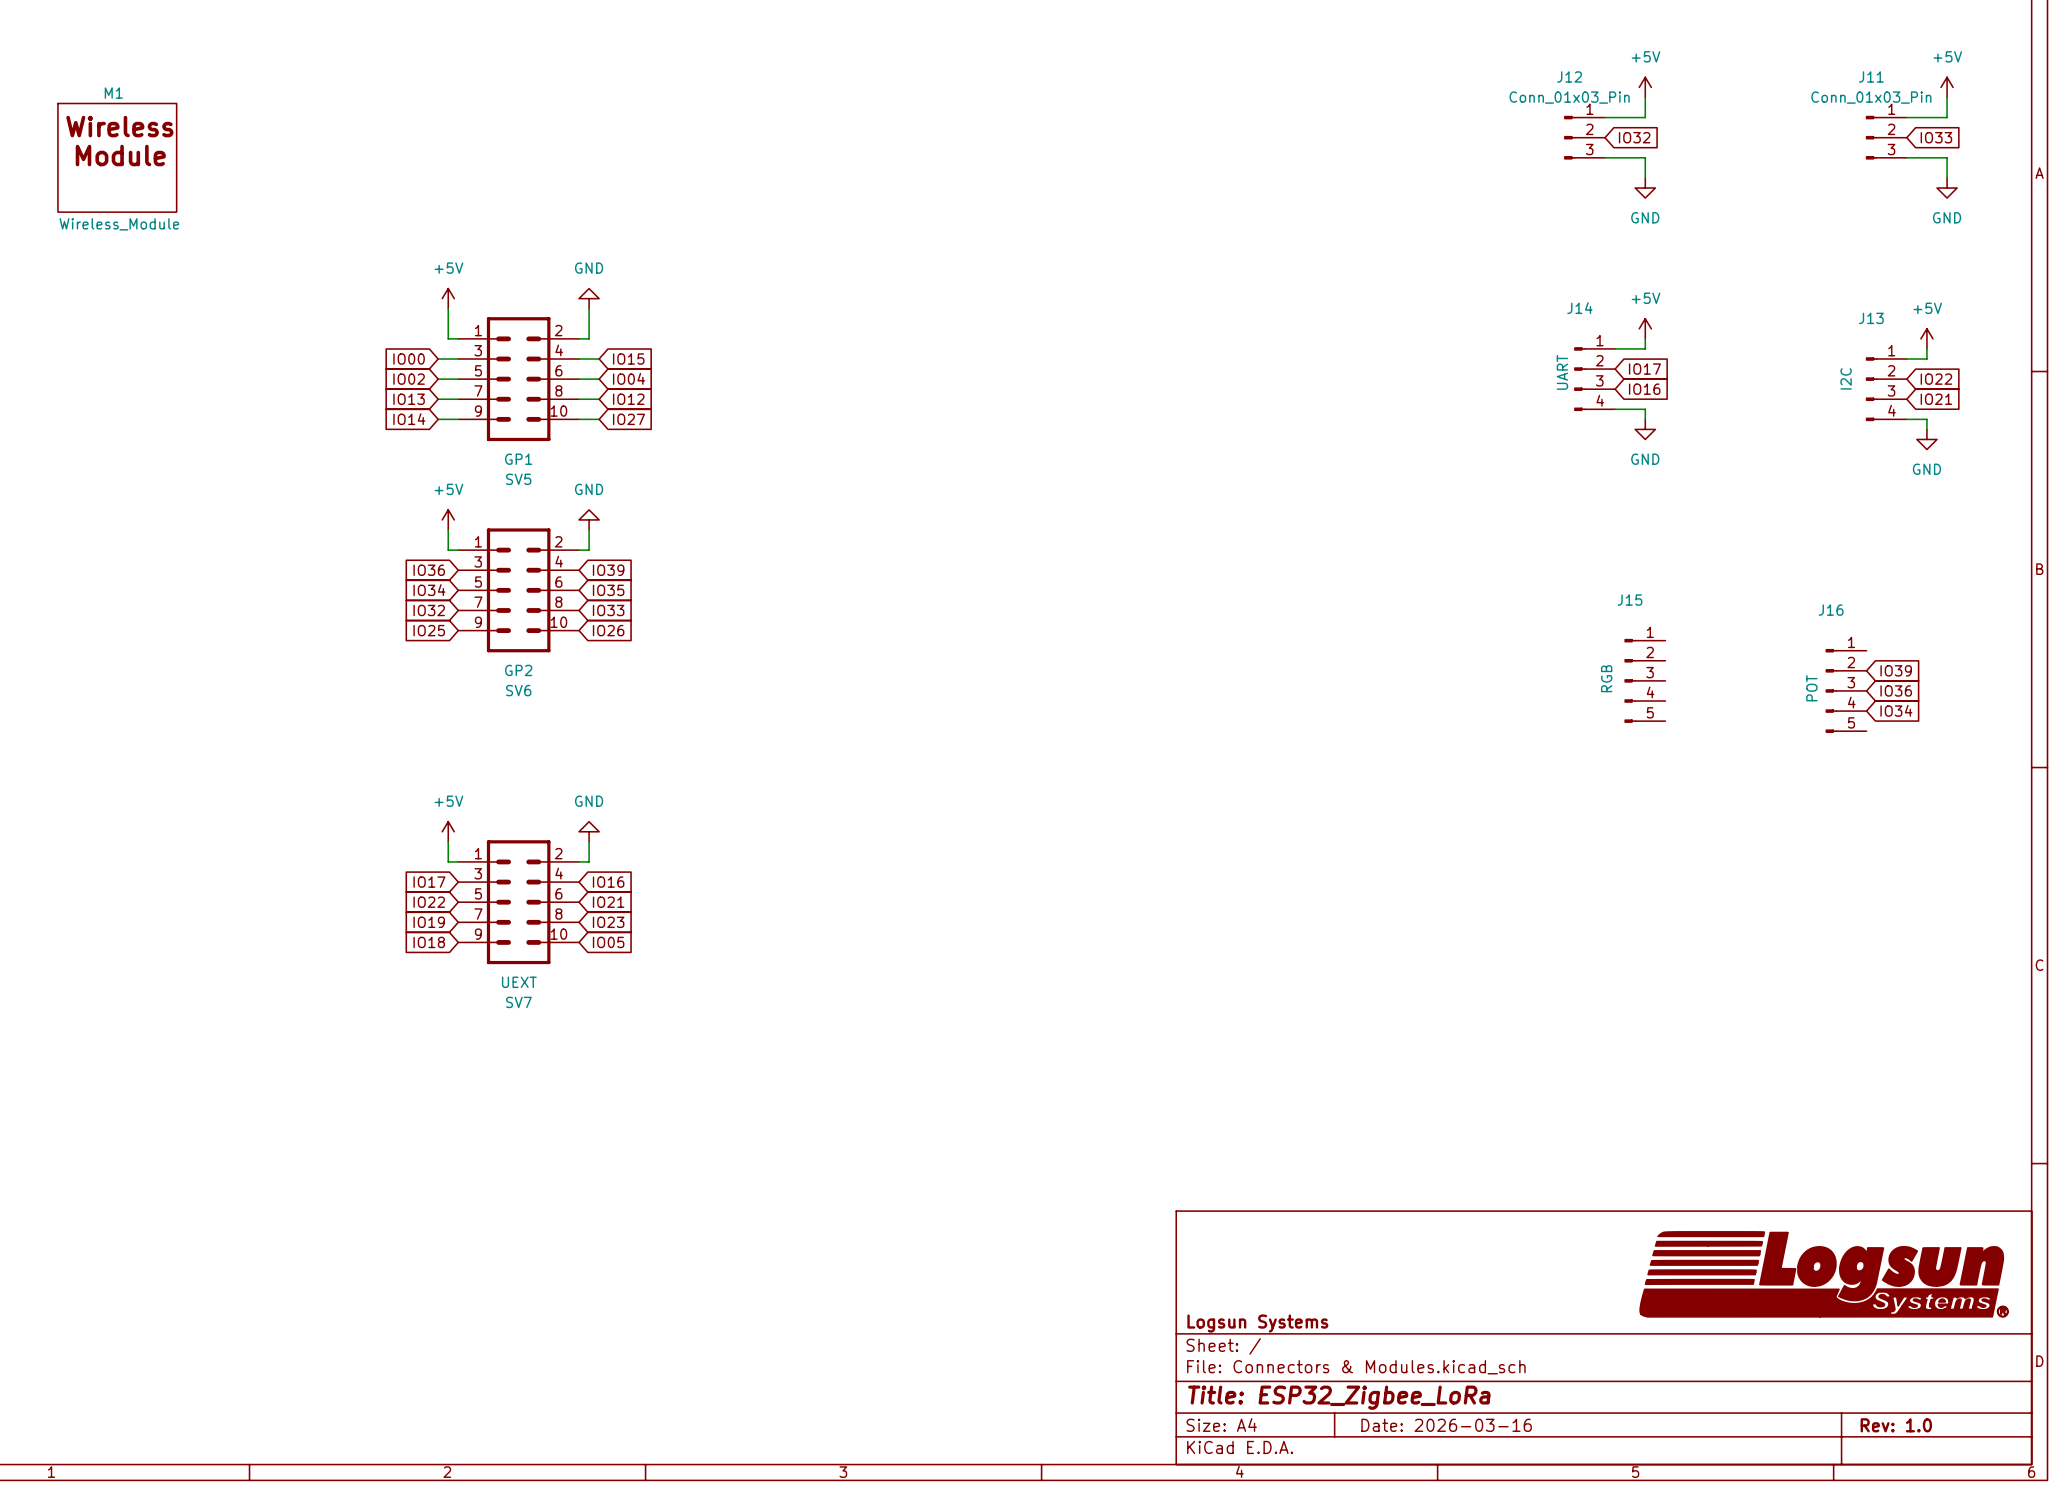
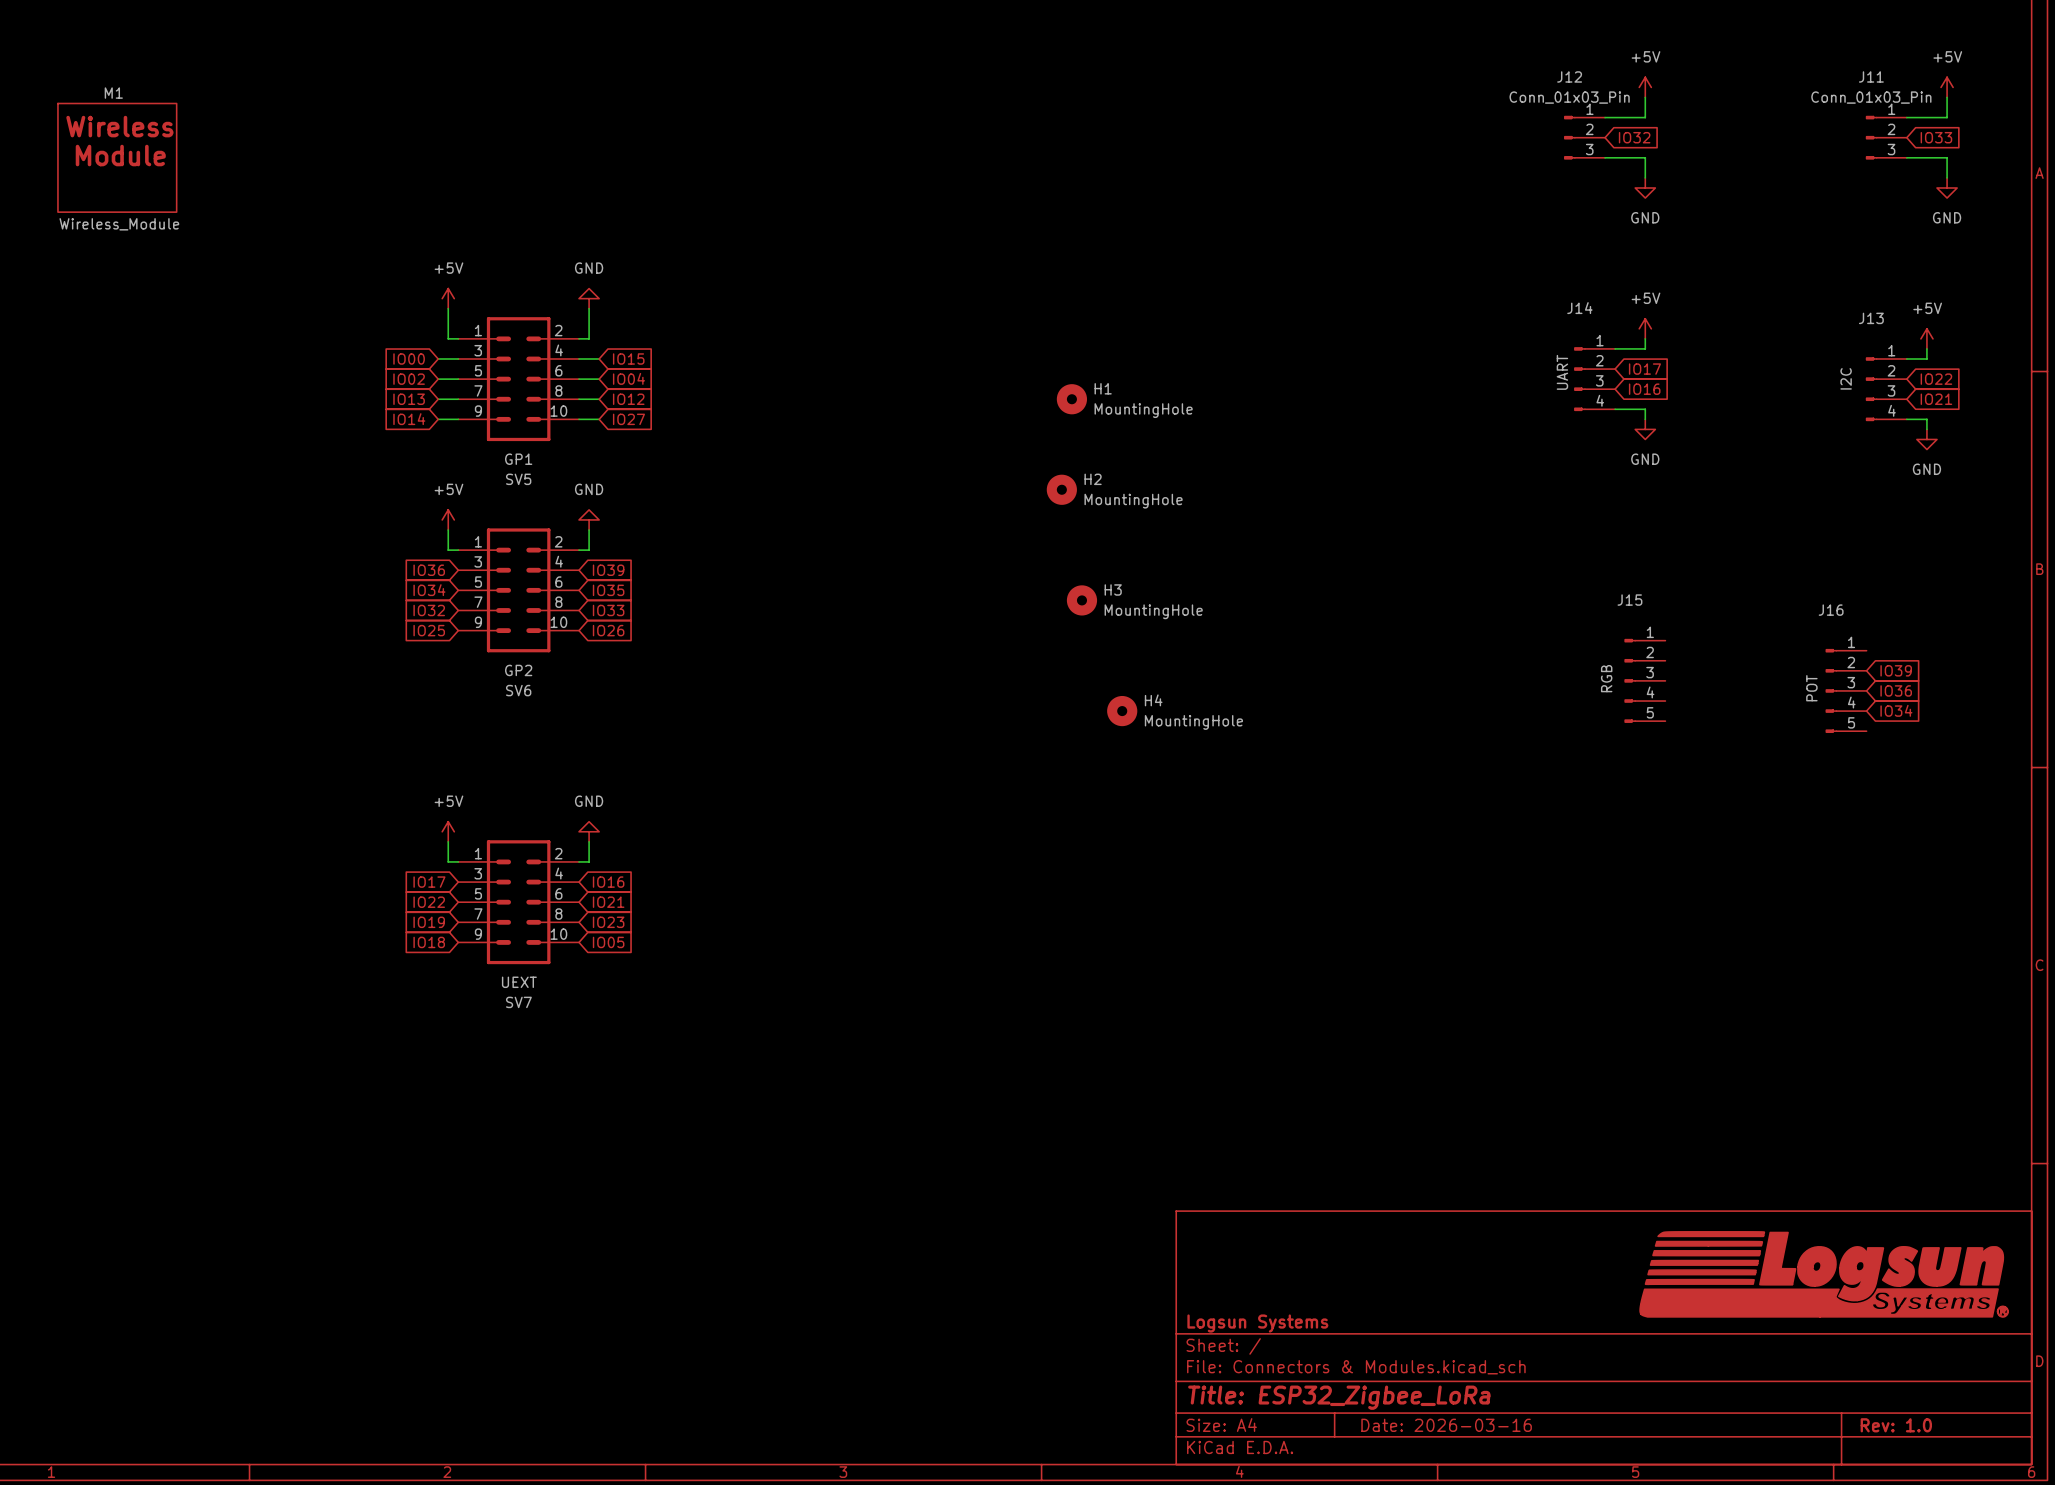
H1: none -> MountingHole (1071, 399)
H2: none -> MountingHole (1061, 489)
H3: none -> MountingHole (1081, 600)
H4: none -> MountingHole (1122, 711)

